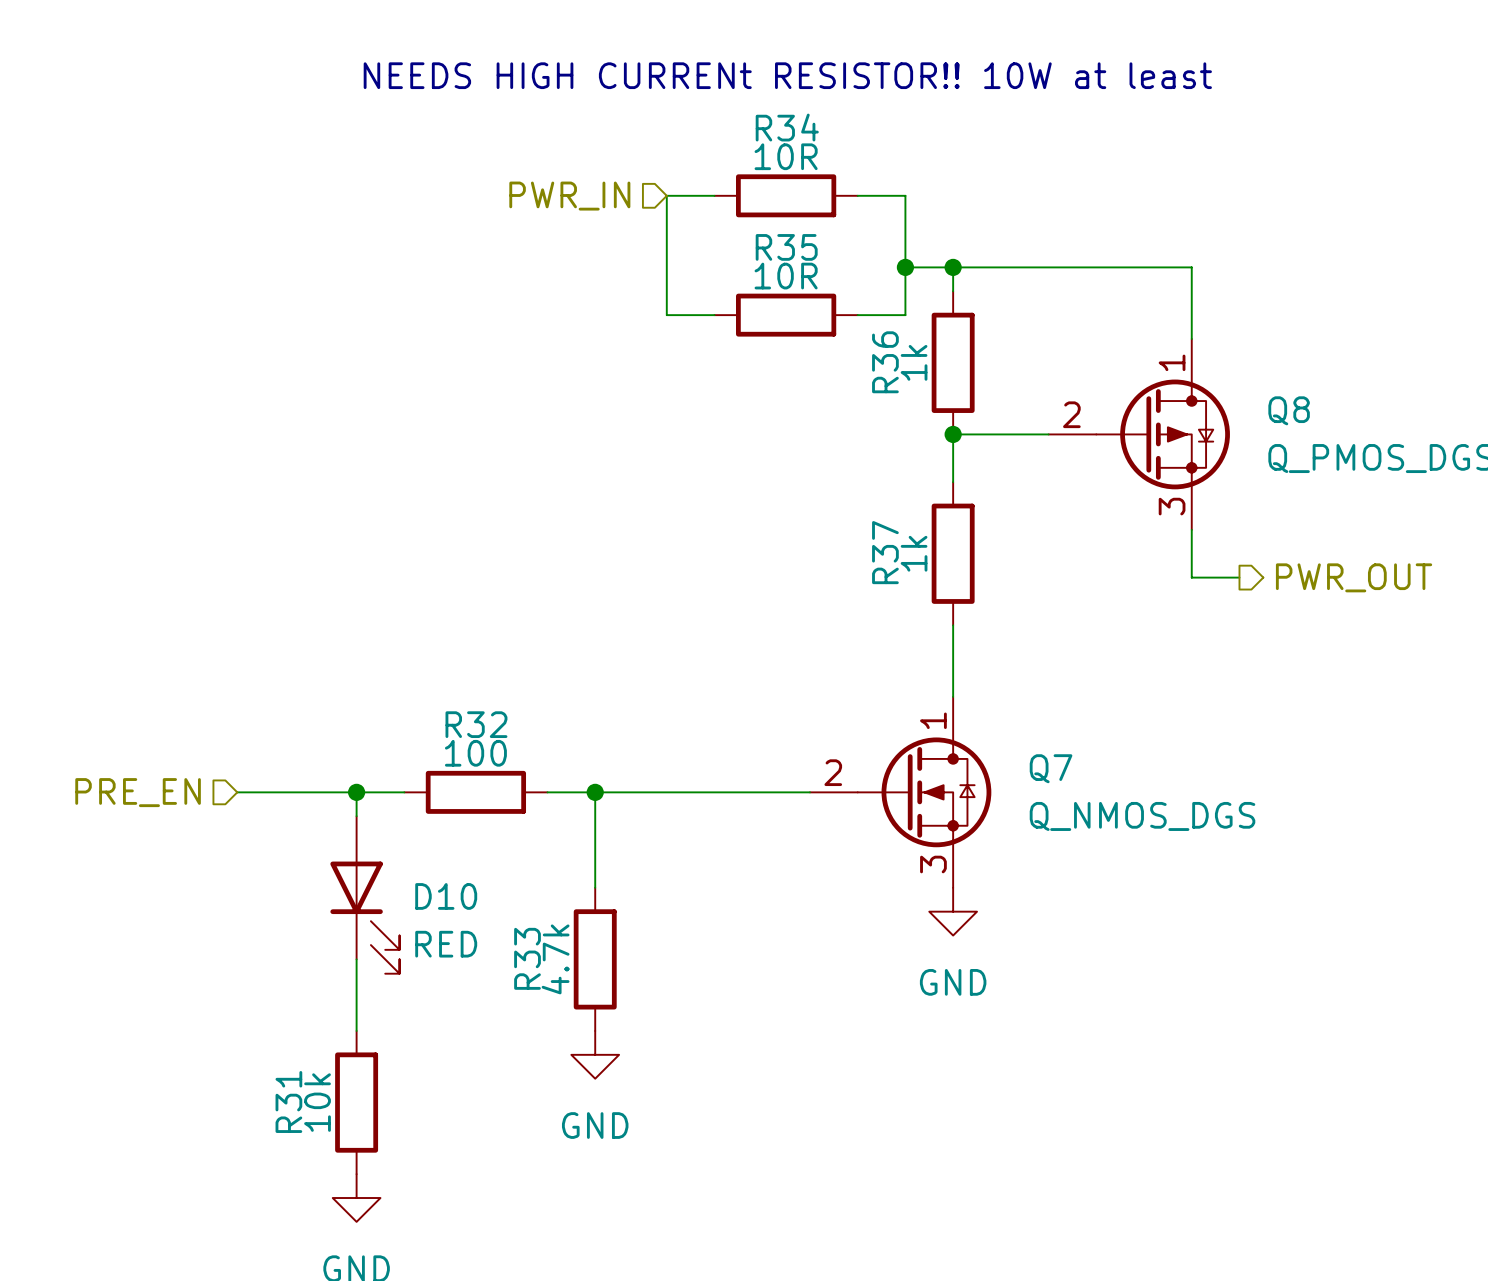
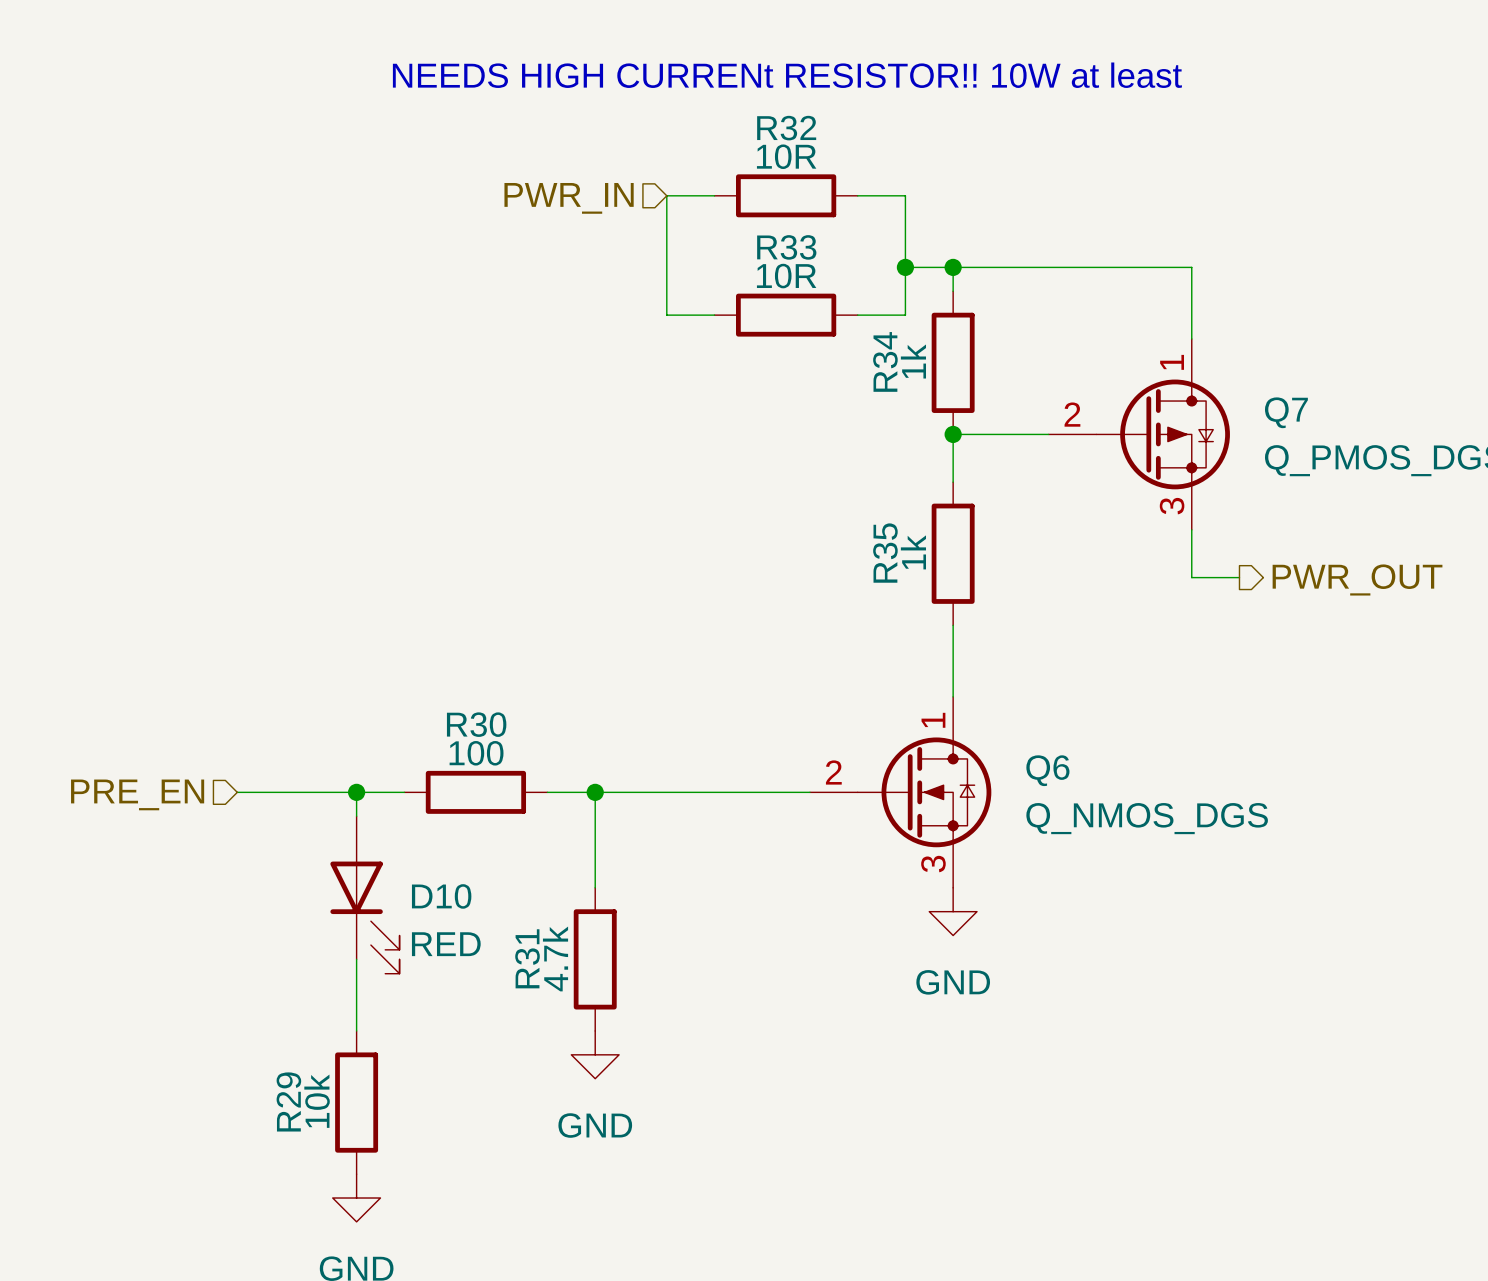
R34 name: R34 (787, 127) -> R32 (786, 128)
R35 name: R35 (786, 247) -> R33 (786, 247)
R36 name: R36 (885, 362) -> R34 (885, 361)
Q8 name: Q8 (1289, 410) -> Q7 (1286, 412)
R37 name: R37 (885, 552) -> R35 (885, 553)
R32 name: R32 (476, 724) -> R30 (476, 724)
Q7 name: Q7 (1051, 768) -> Q6 (1047, 770)
R33 name: R33 (527, 958) -> R31 (527, 958)
R31 name: R31 (288, 1101) -> R29 (288, 1101)

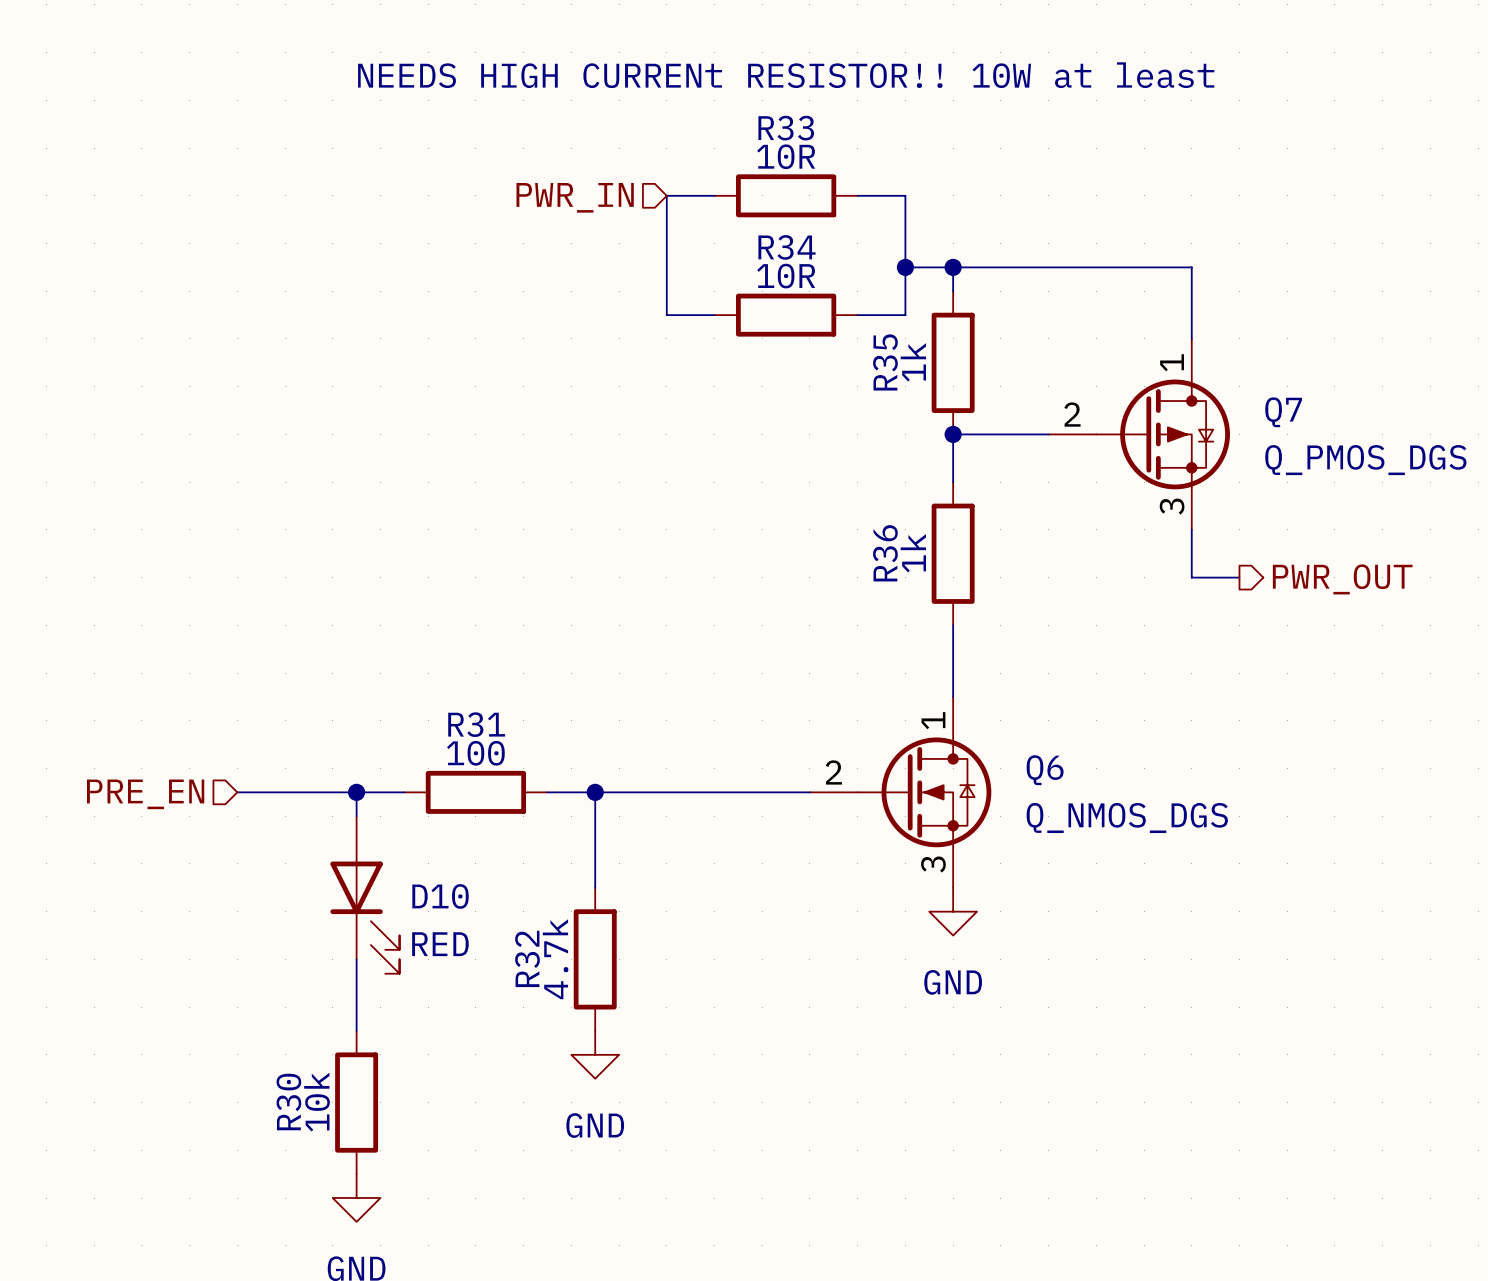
R32 name: R32 (786, 128) -> R33 (786, 128)
R33 name: R33 (786, 247) -> R34 (787, 247)
R34 name: R34 (885, 361) -> R35 (885, 362)
R35 name: R35 (885, 553) -> R36 (885, 553)
R30 name: R30 (476, 724) -> R31 (476, 724)
R31 name: R31 (527, 958) -> R32 (527, 958)
R29 name: R29 (288, 1101) -> R30 (288, 1101)

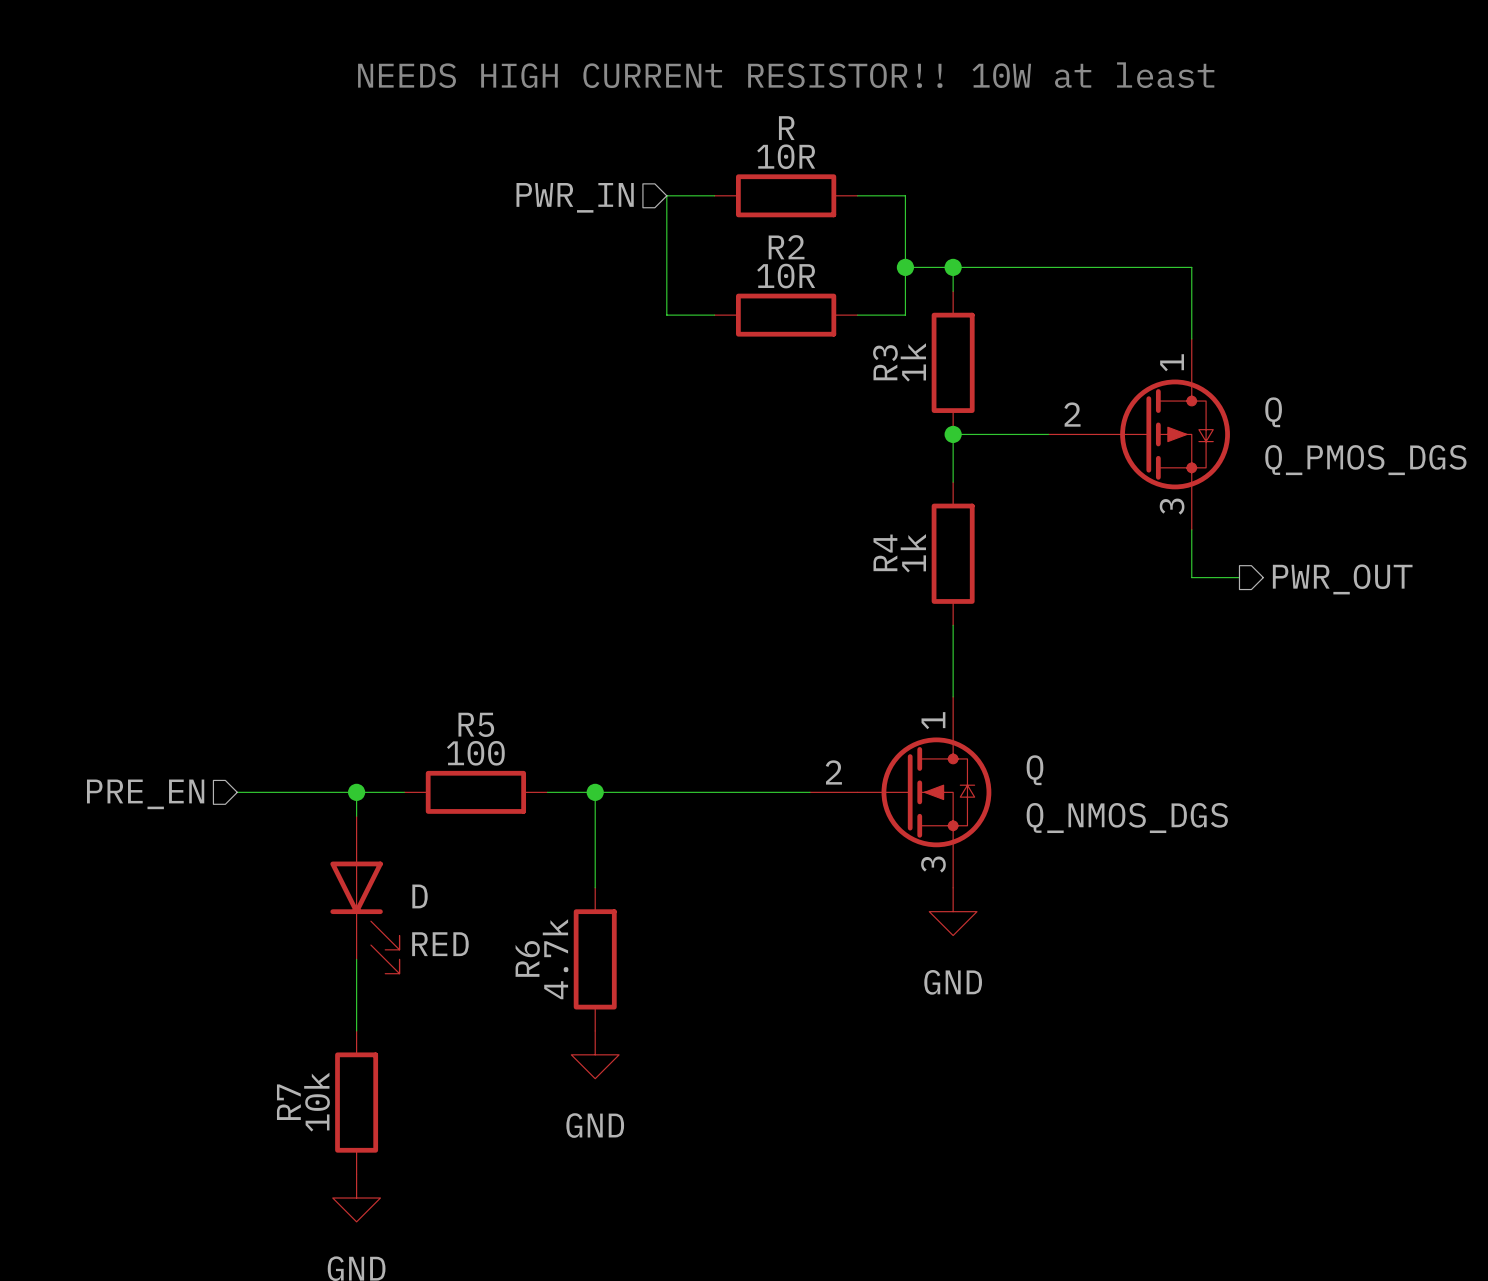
R33 name: R33 (786, 128) -> R (786, 128)
R34 name: R34 (787, 247) -> R2 (786, 247)
R35 name: R35 (885, 362) -> R3 (885, 362)
Q7 name: Q7 (1283, 412) -> Q (1273, 412)
R36 name: R36 (885, 553) -> R4 (885, 552)
R31 name: R31 (476, 724) -> R5 (476, 724)
Q6 name: Q6 (1045, 770) -> Q (1034, 770)
D10 name: D10 (440, 896) -> D (420, 896)
R32 name: R32 (527, 958) -> R6 (527, 958)
R30 name: R30 (288, 1101) -> R7 (288, 1102)

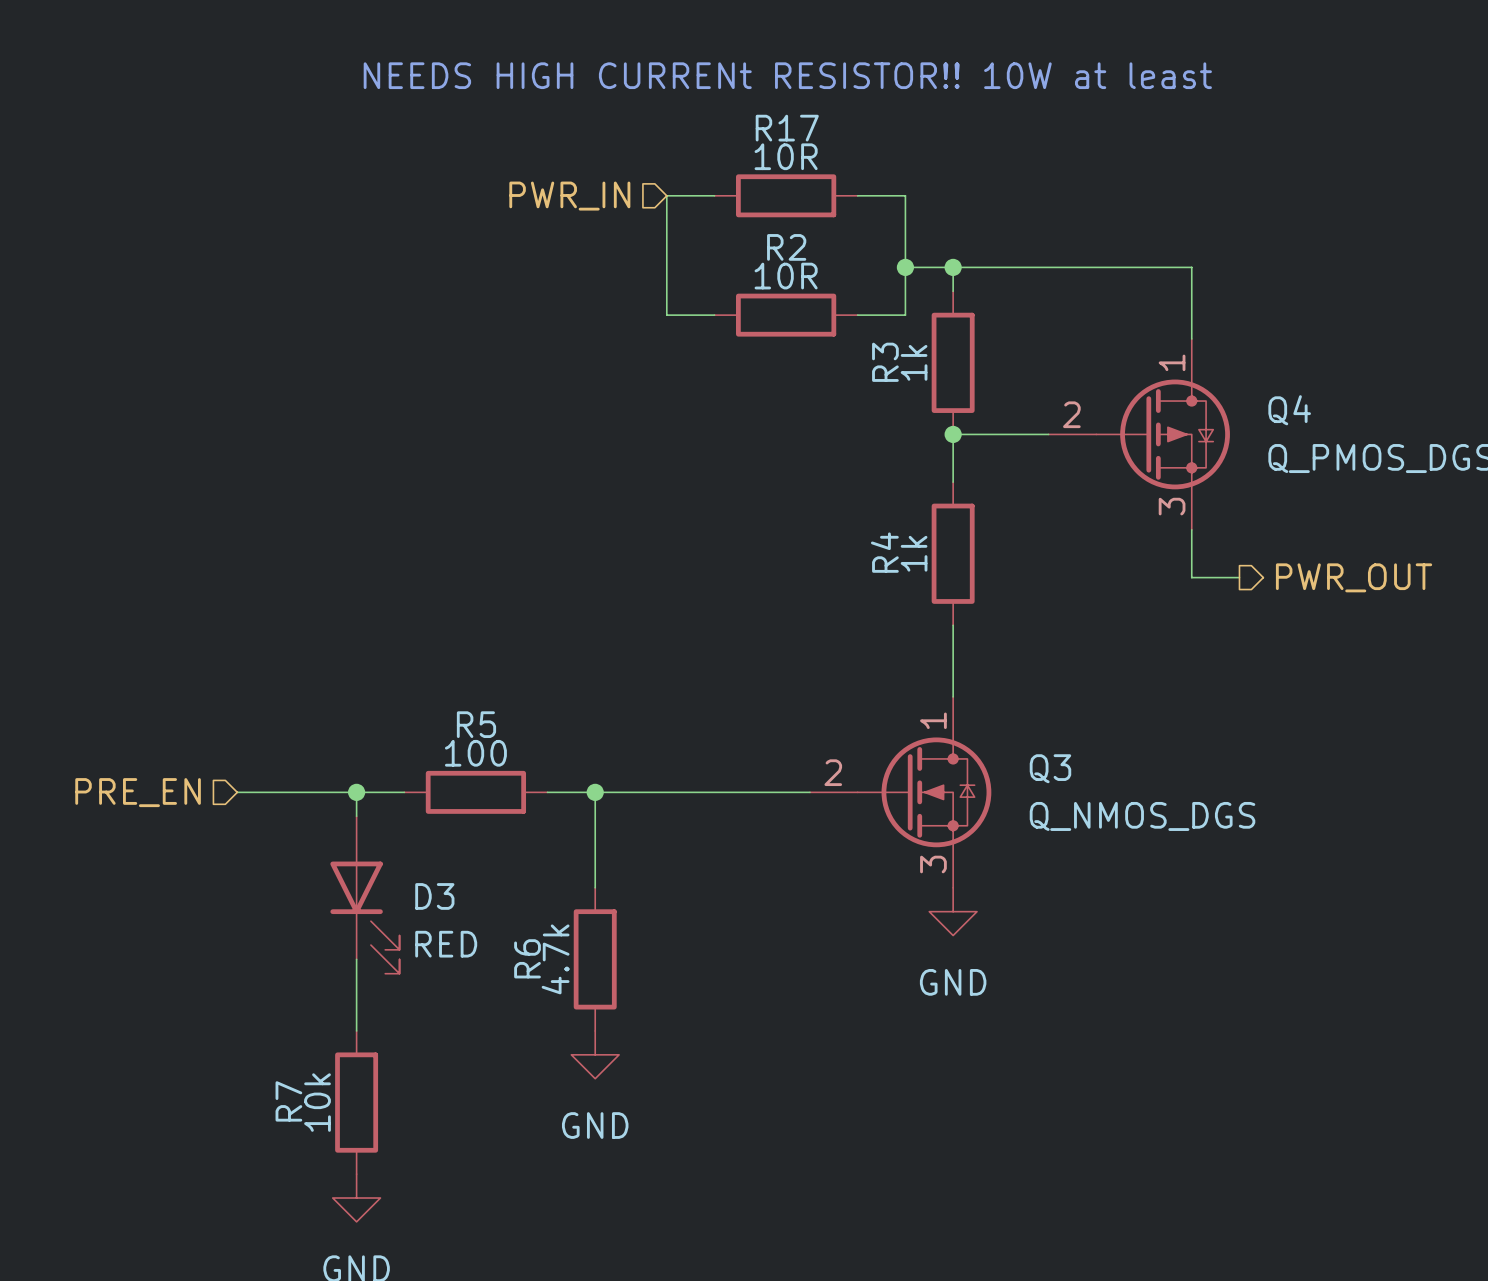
R name: R (786, 128) -> R17 (787, 128)
Q name: Q (1273, 412) -> Q4 (1289, 410)
Q name: Q (1034, 770) -> Q3 (1050, 768)
D name: D (420, 896) -> D3 (434, 896)

